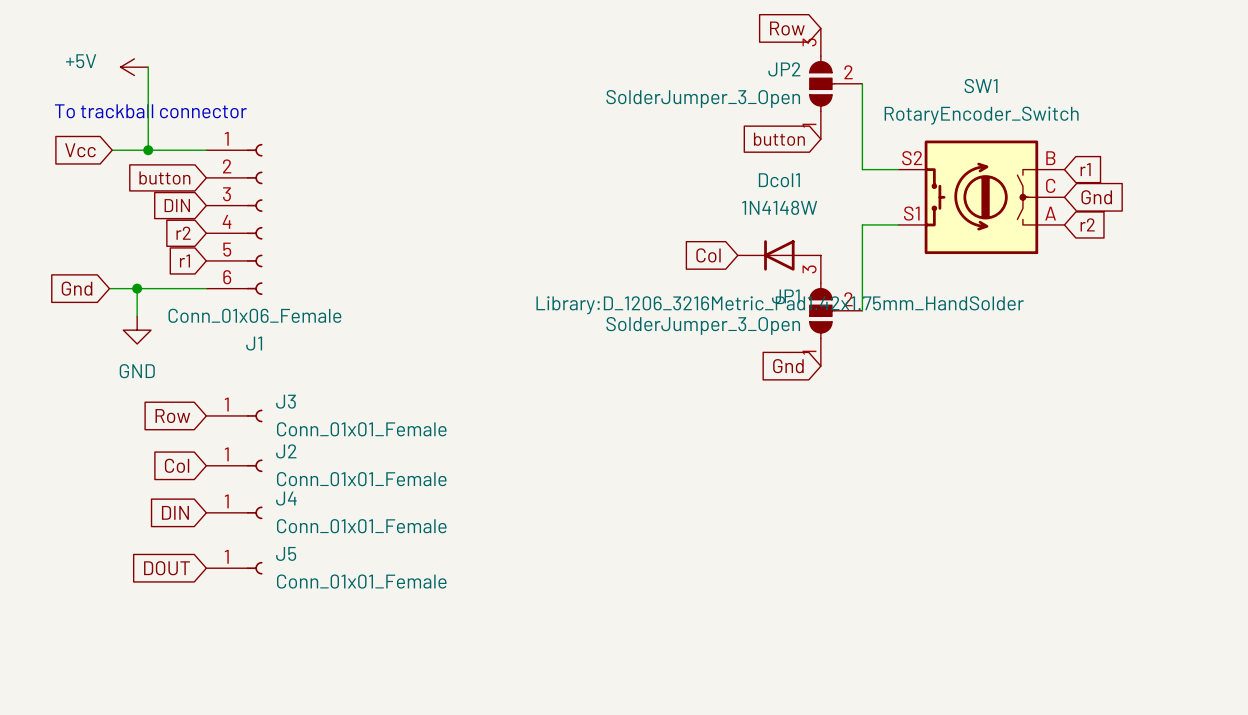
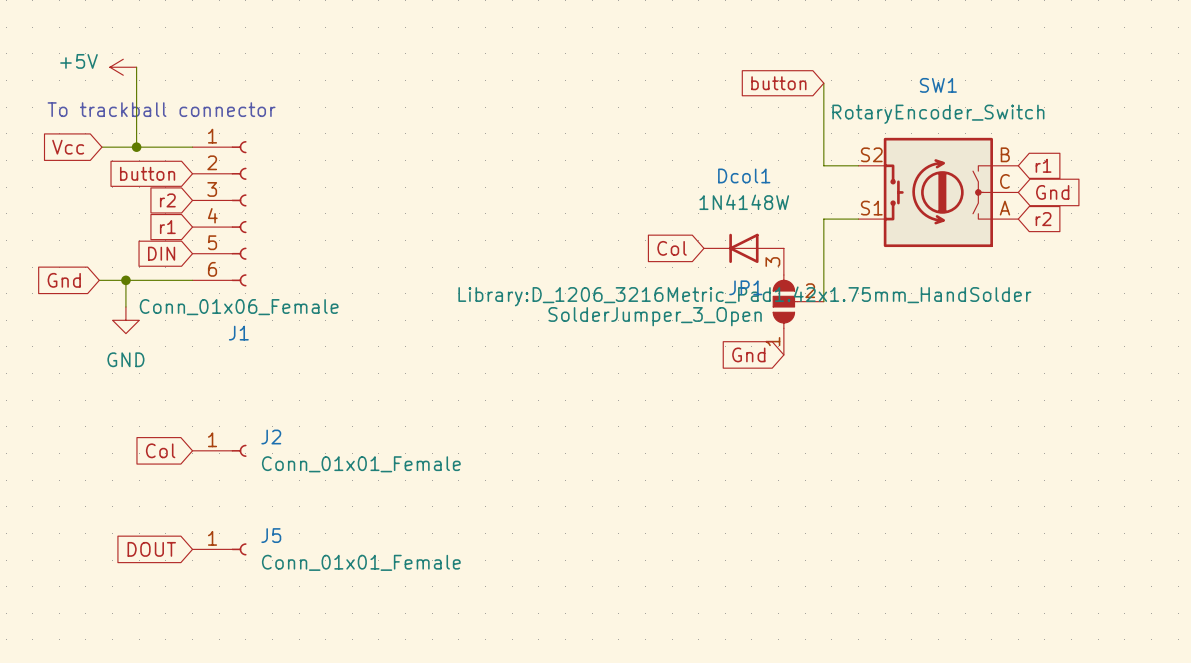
global label: Row (787, 28) -> none
JP2: SolderJumper_3_Open (836, 83) -> none
global label position: button (779, 139) -> button (778, 83)
global label: DIN (177, 205) -> r2 (167, 200)
global label: r2 (183, 233) -> r1 (167, 227)
global label: r1 (184, 260) -> DIN (161, 253)
J3: Conn_01x01_Female (234, 415) -> none
global label: Row (172, 416) -> none
global label: DIN (175, 512) -> none
J4: Conn_01x01_Female (234, 512) -> none

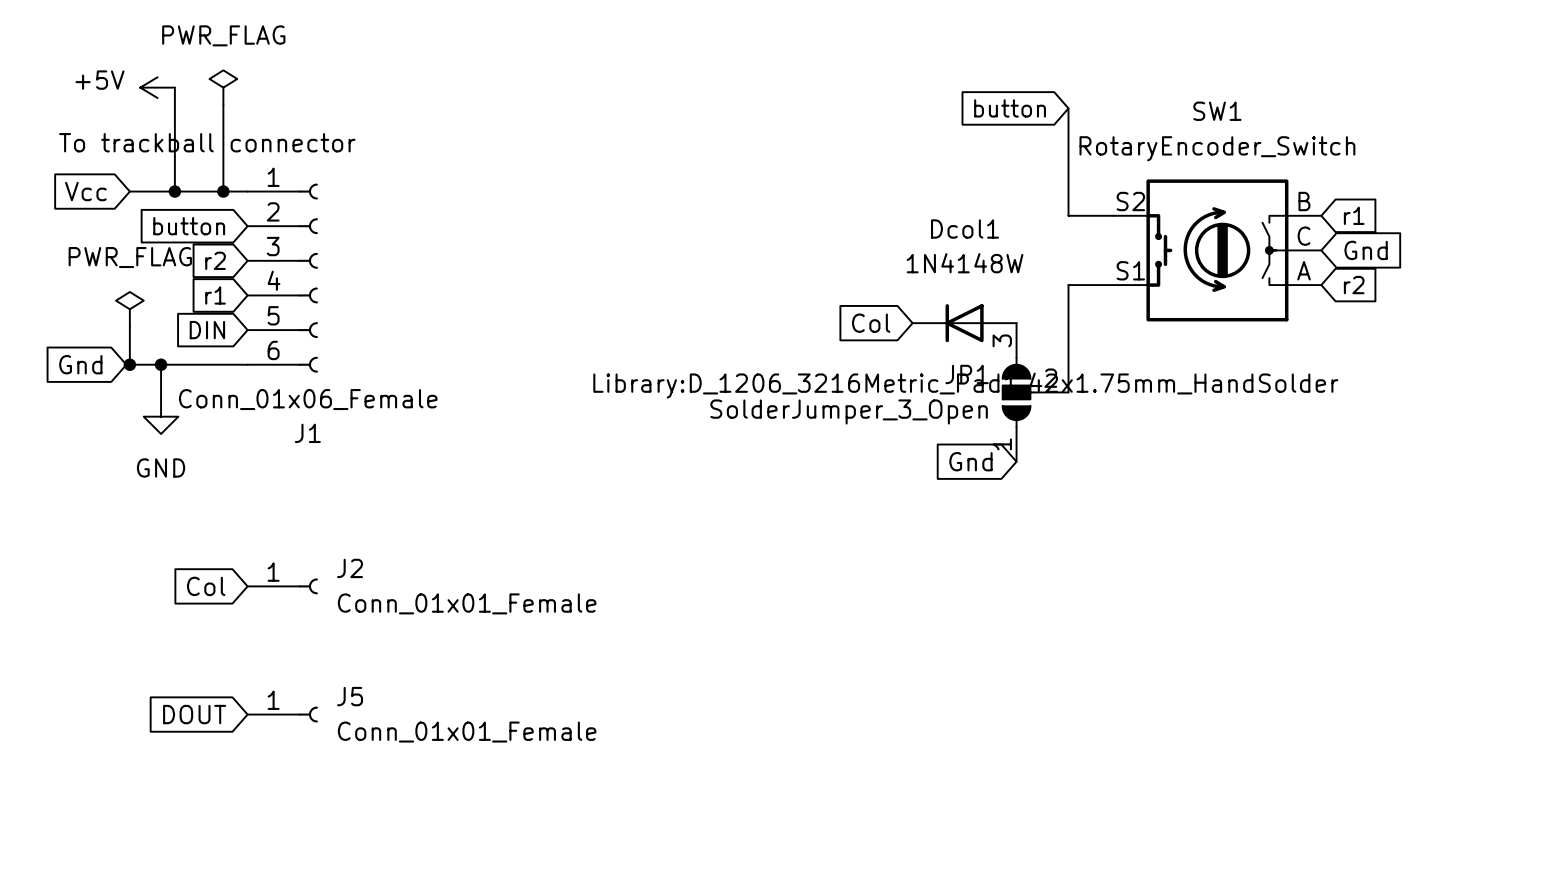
power symbol: none -> PWR_FLAG (223, 87)
wire: none -> (223, 104) (223, 191)
junction: none -> (223, 191)
power symbol: none -> PWR_FLAG (129, 309)
wire: none -> (129, 326) (129, 364)
junction: none -> (129, 364)

